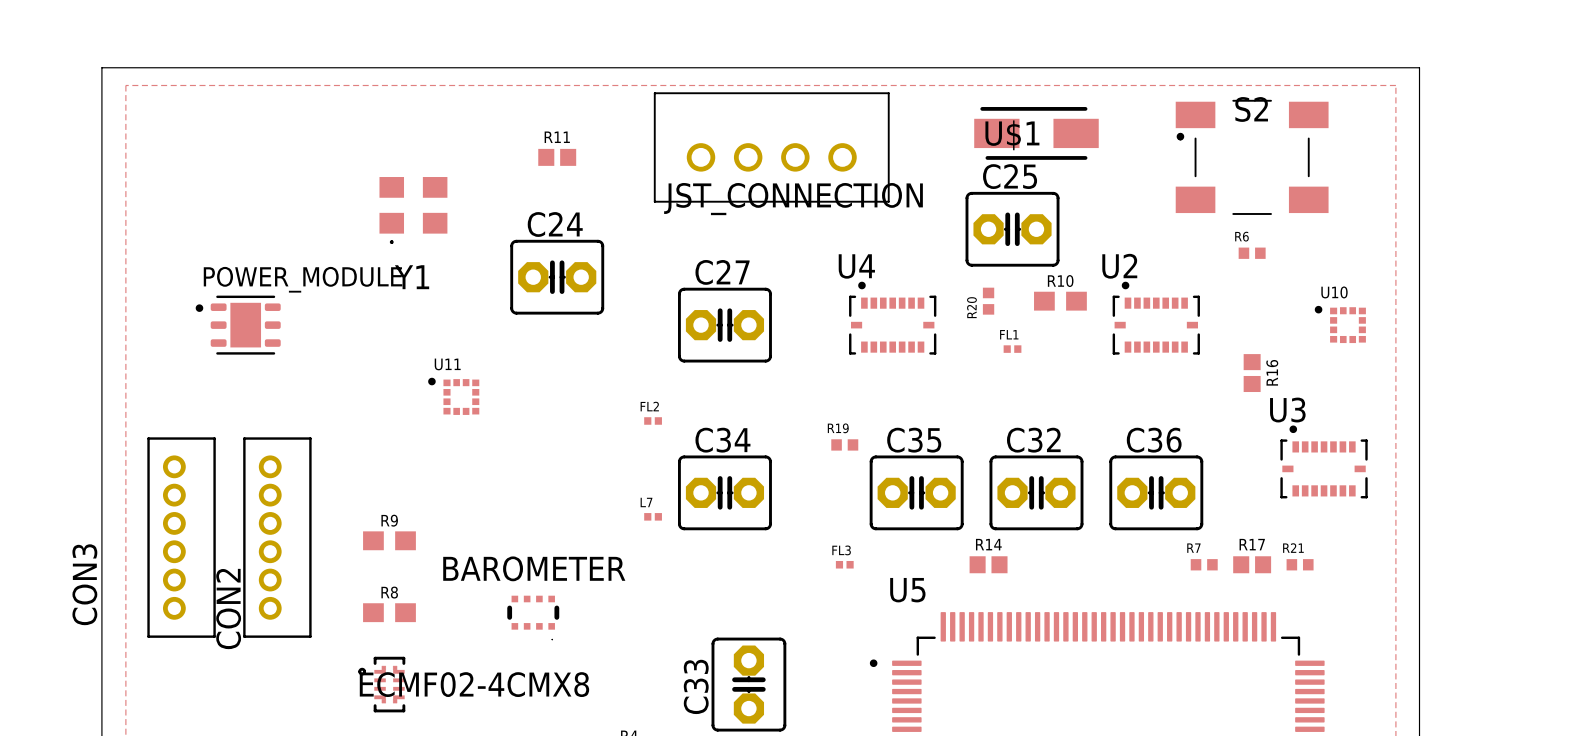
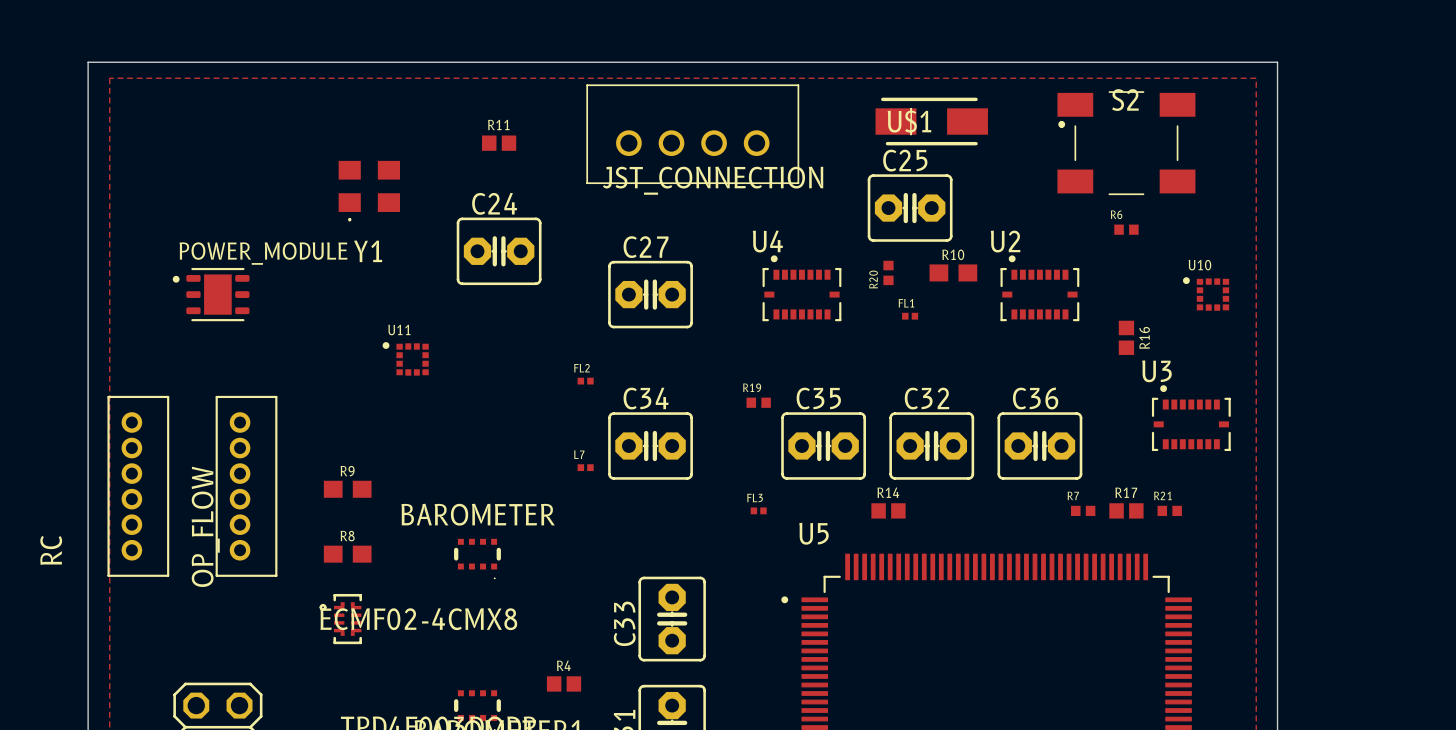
RC: none -> (138, 486)
CON3: (181, 537) -> none
CON2 name: CON2 (228, 609) -> OP_FLOW (205, 526)

